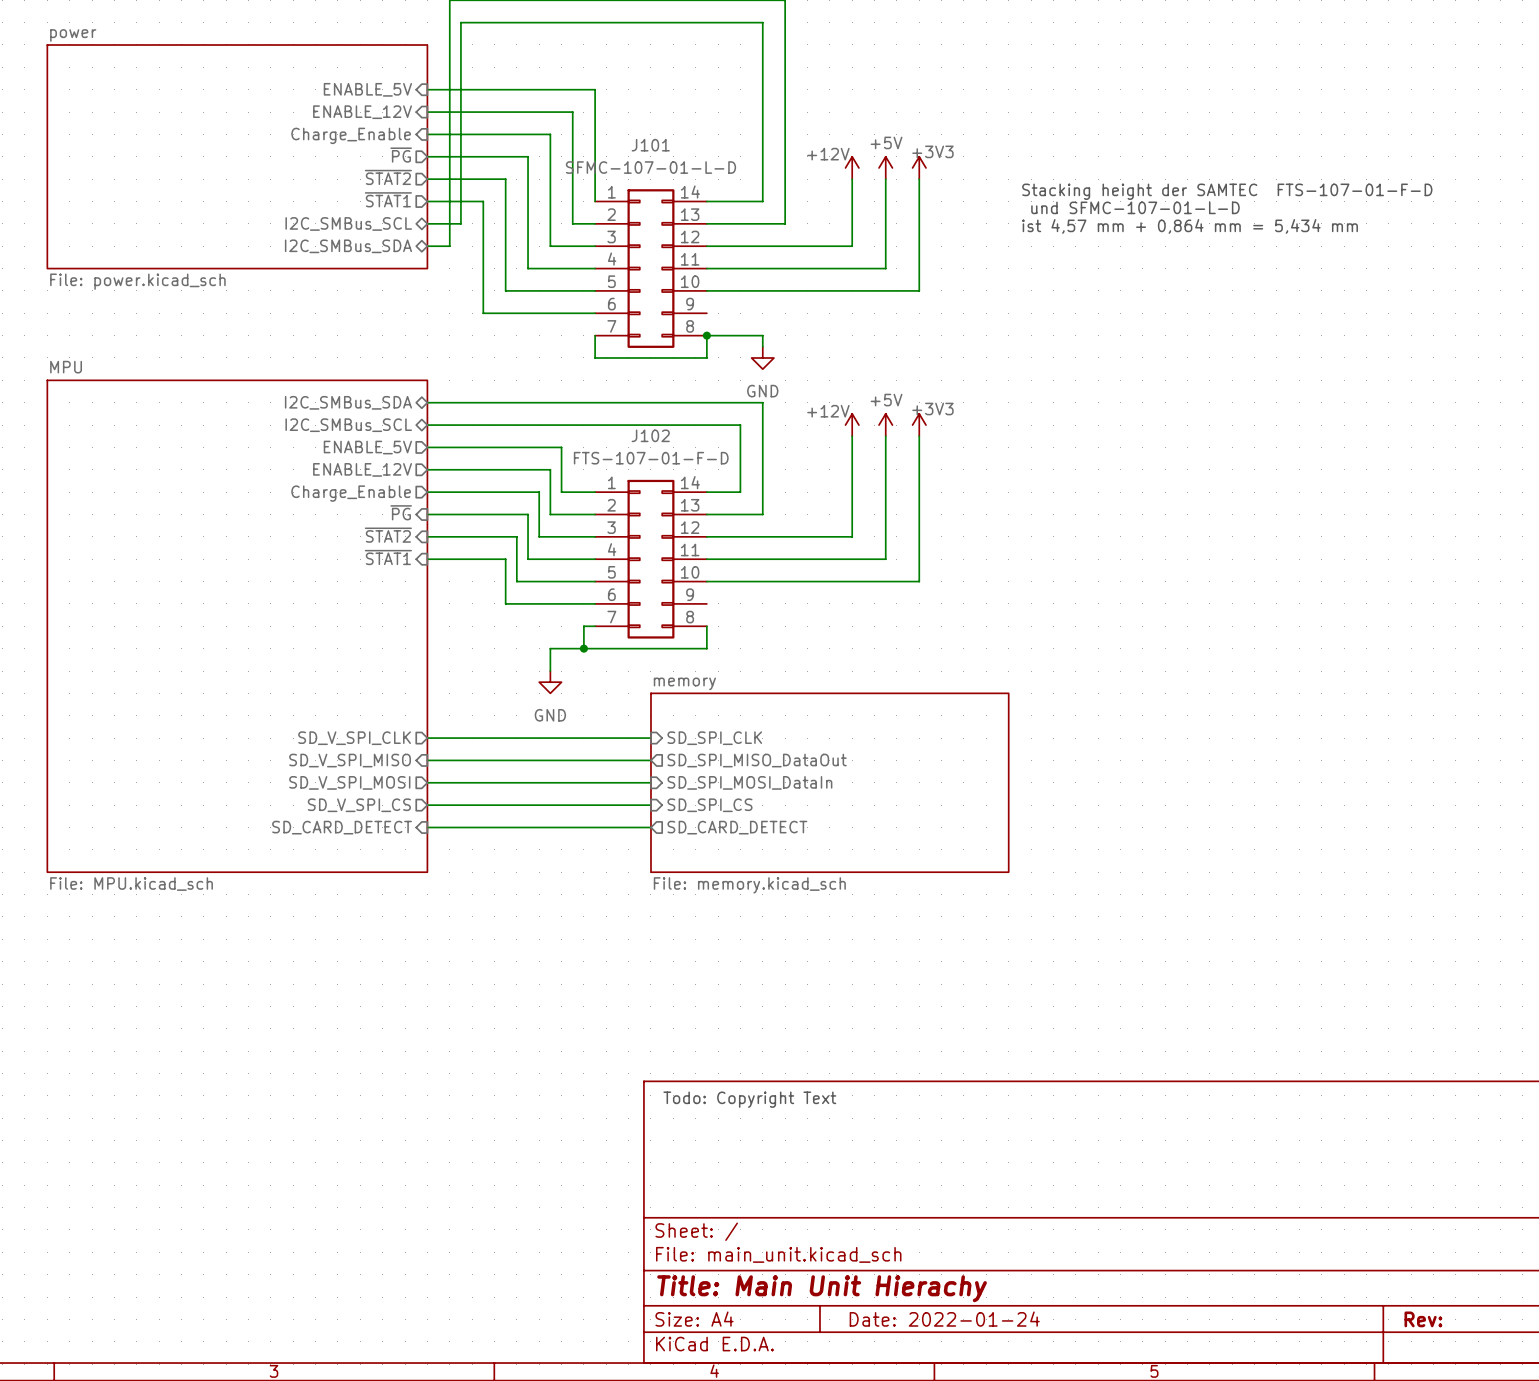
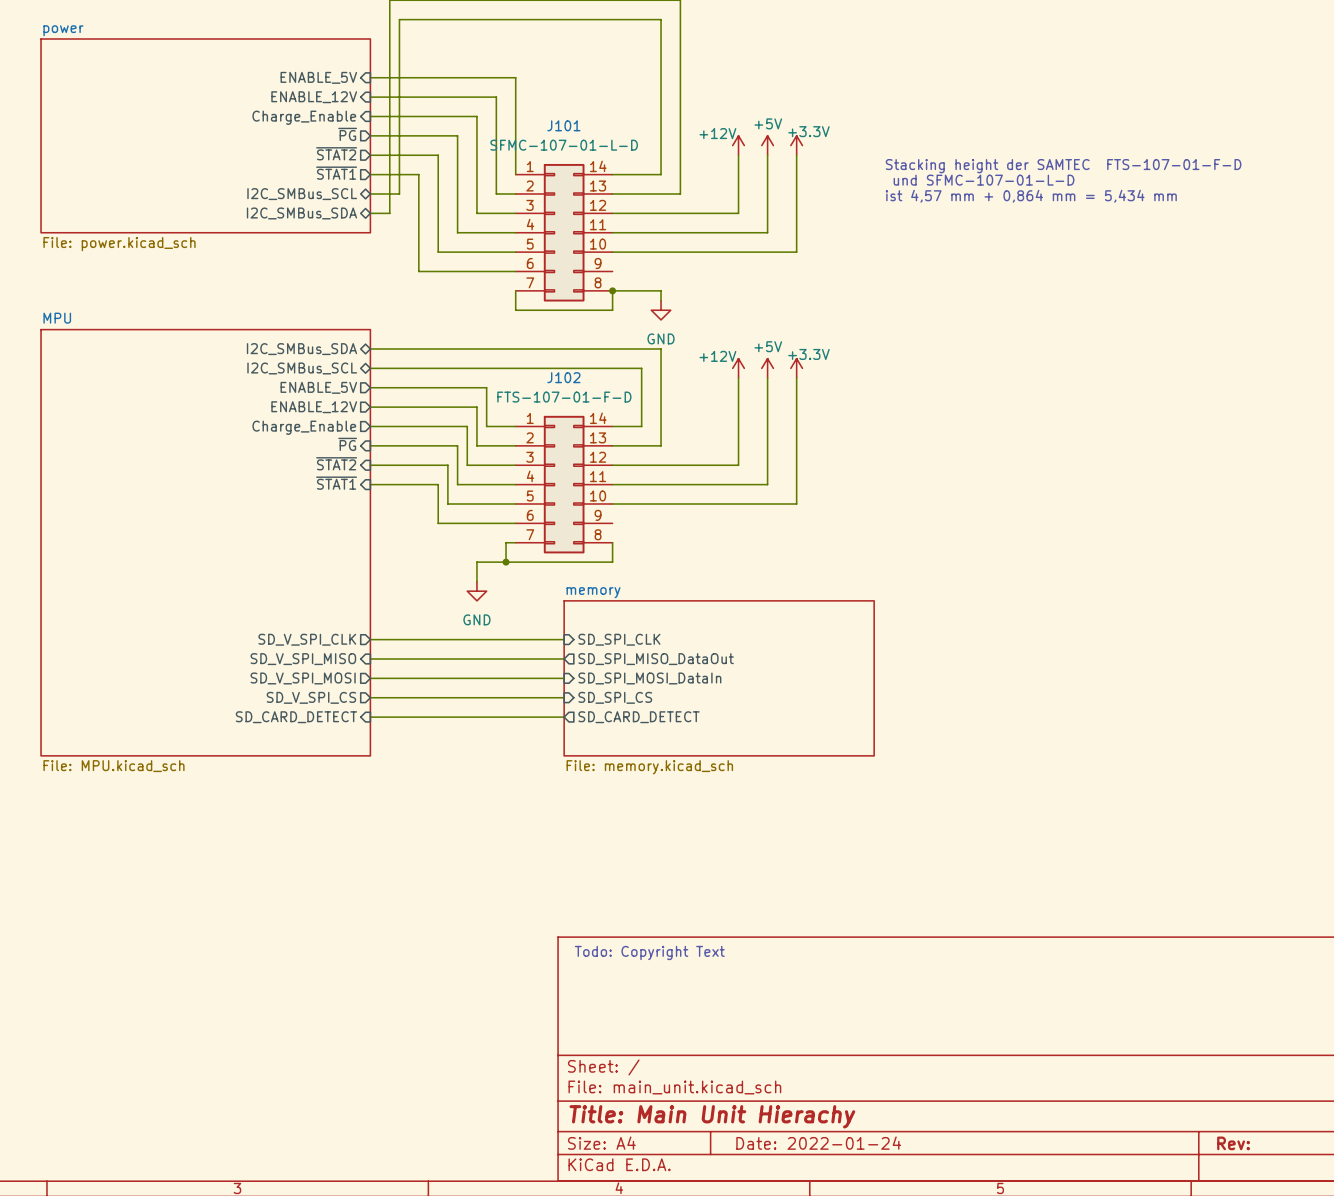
power symbol: +3V3 (919, 167) -> +3.3V (796, 145)
power symbol: +3V3 (919, 425) -> +3.3V (796, 368)

